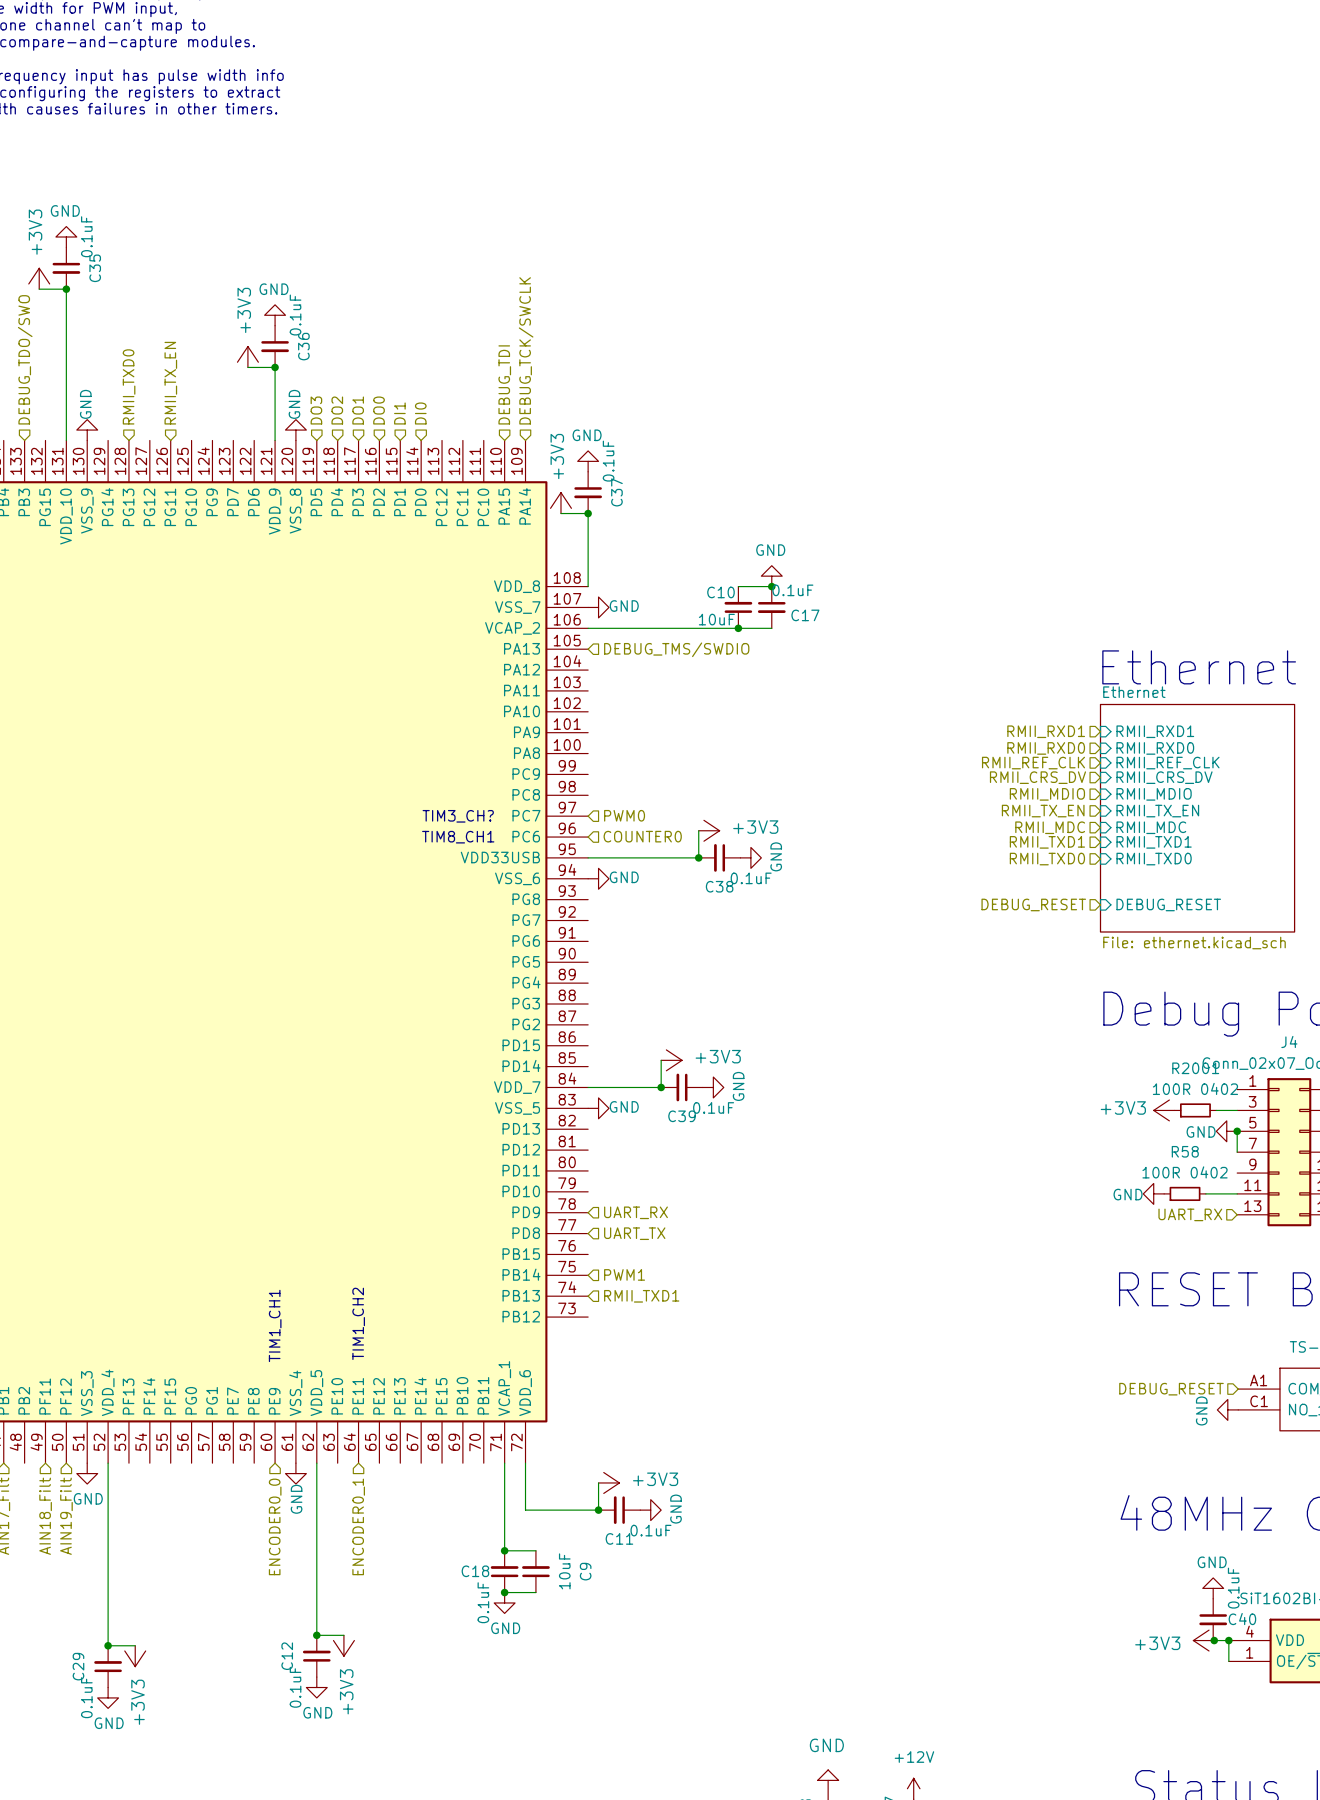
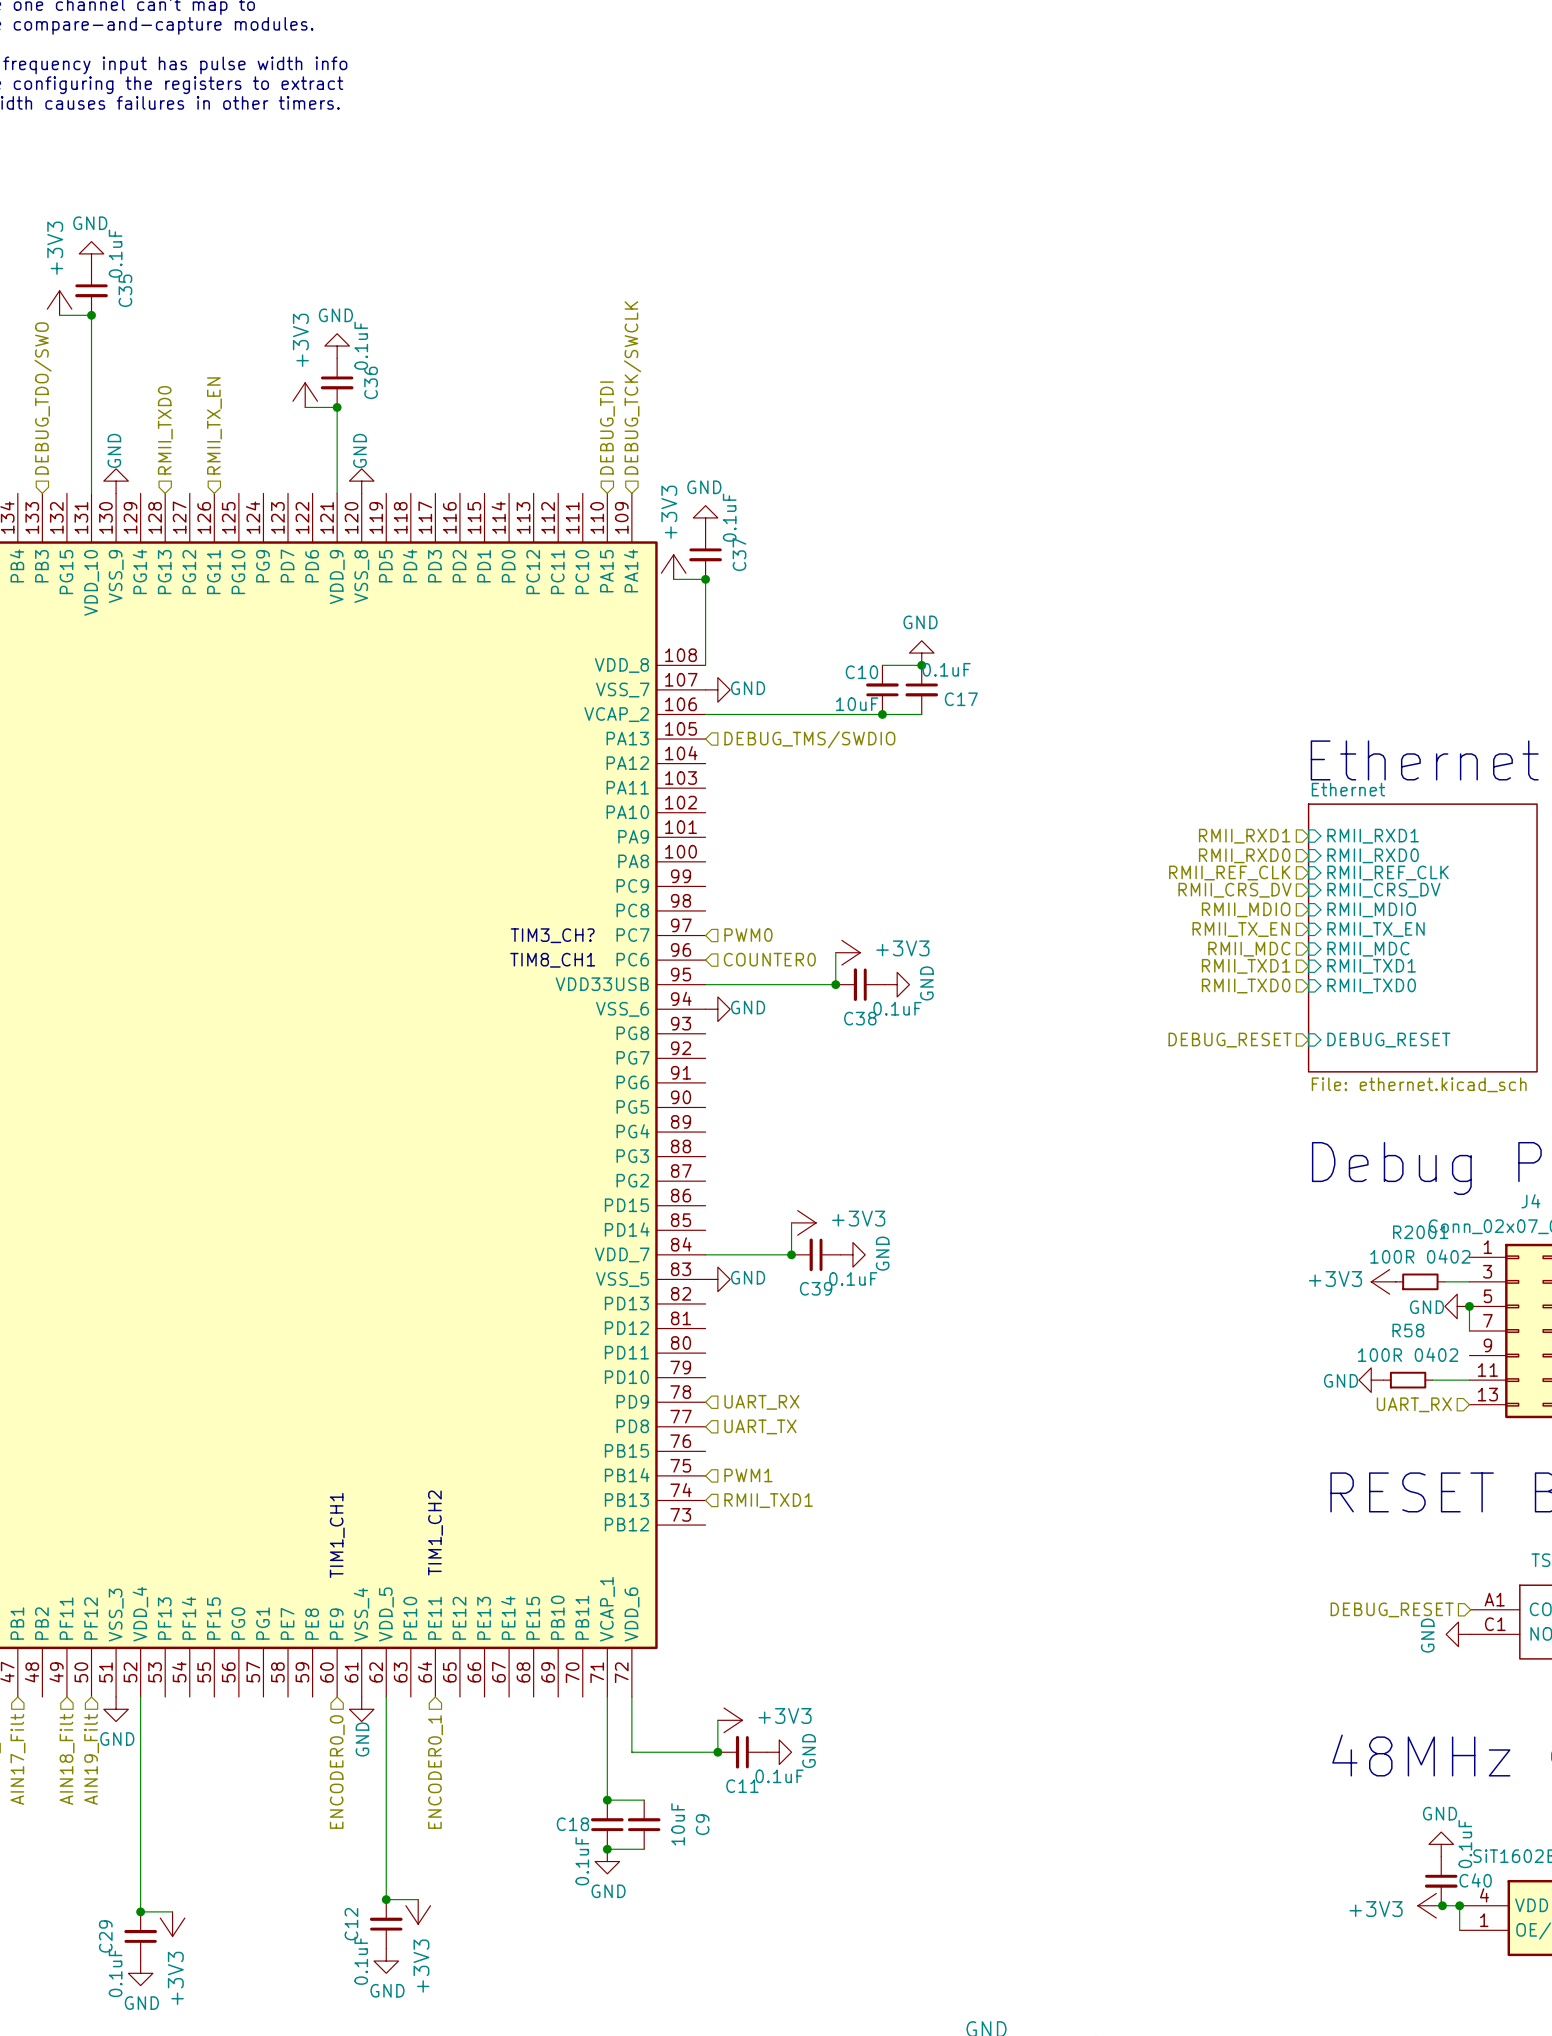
hierarchical label: DO3 (316, 410) -> none
hierarchical label: DO2 (337, 410) -> none
hierarchical label: DO1 (358, 410) -> none
hierarchical label: DO0 (379, 410) -> none
hierarchical label: DI1 (399, 413) -> none
hierarchical label: DI0 (420, 413) -> none

